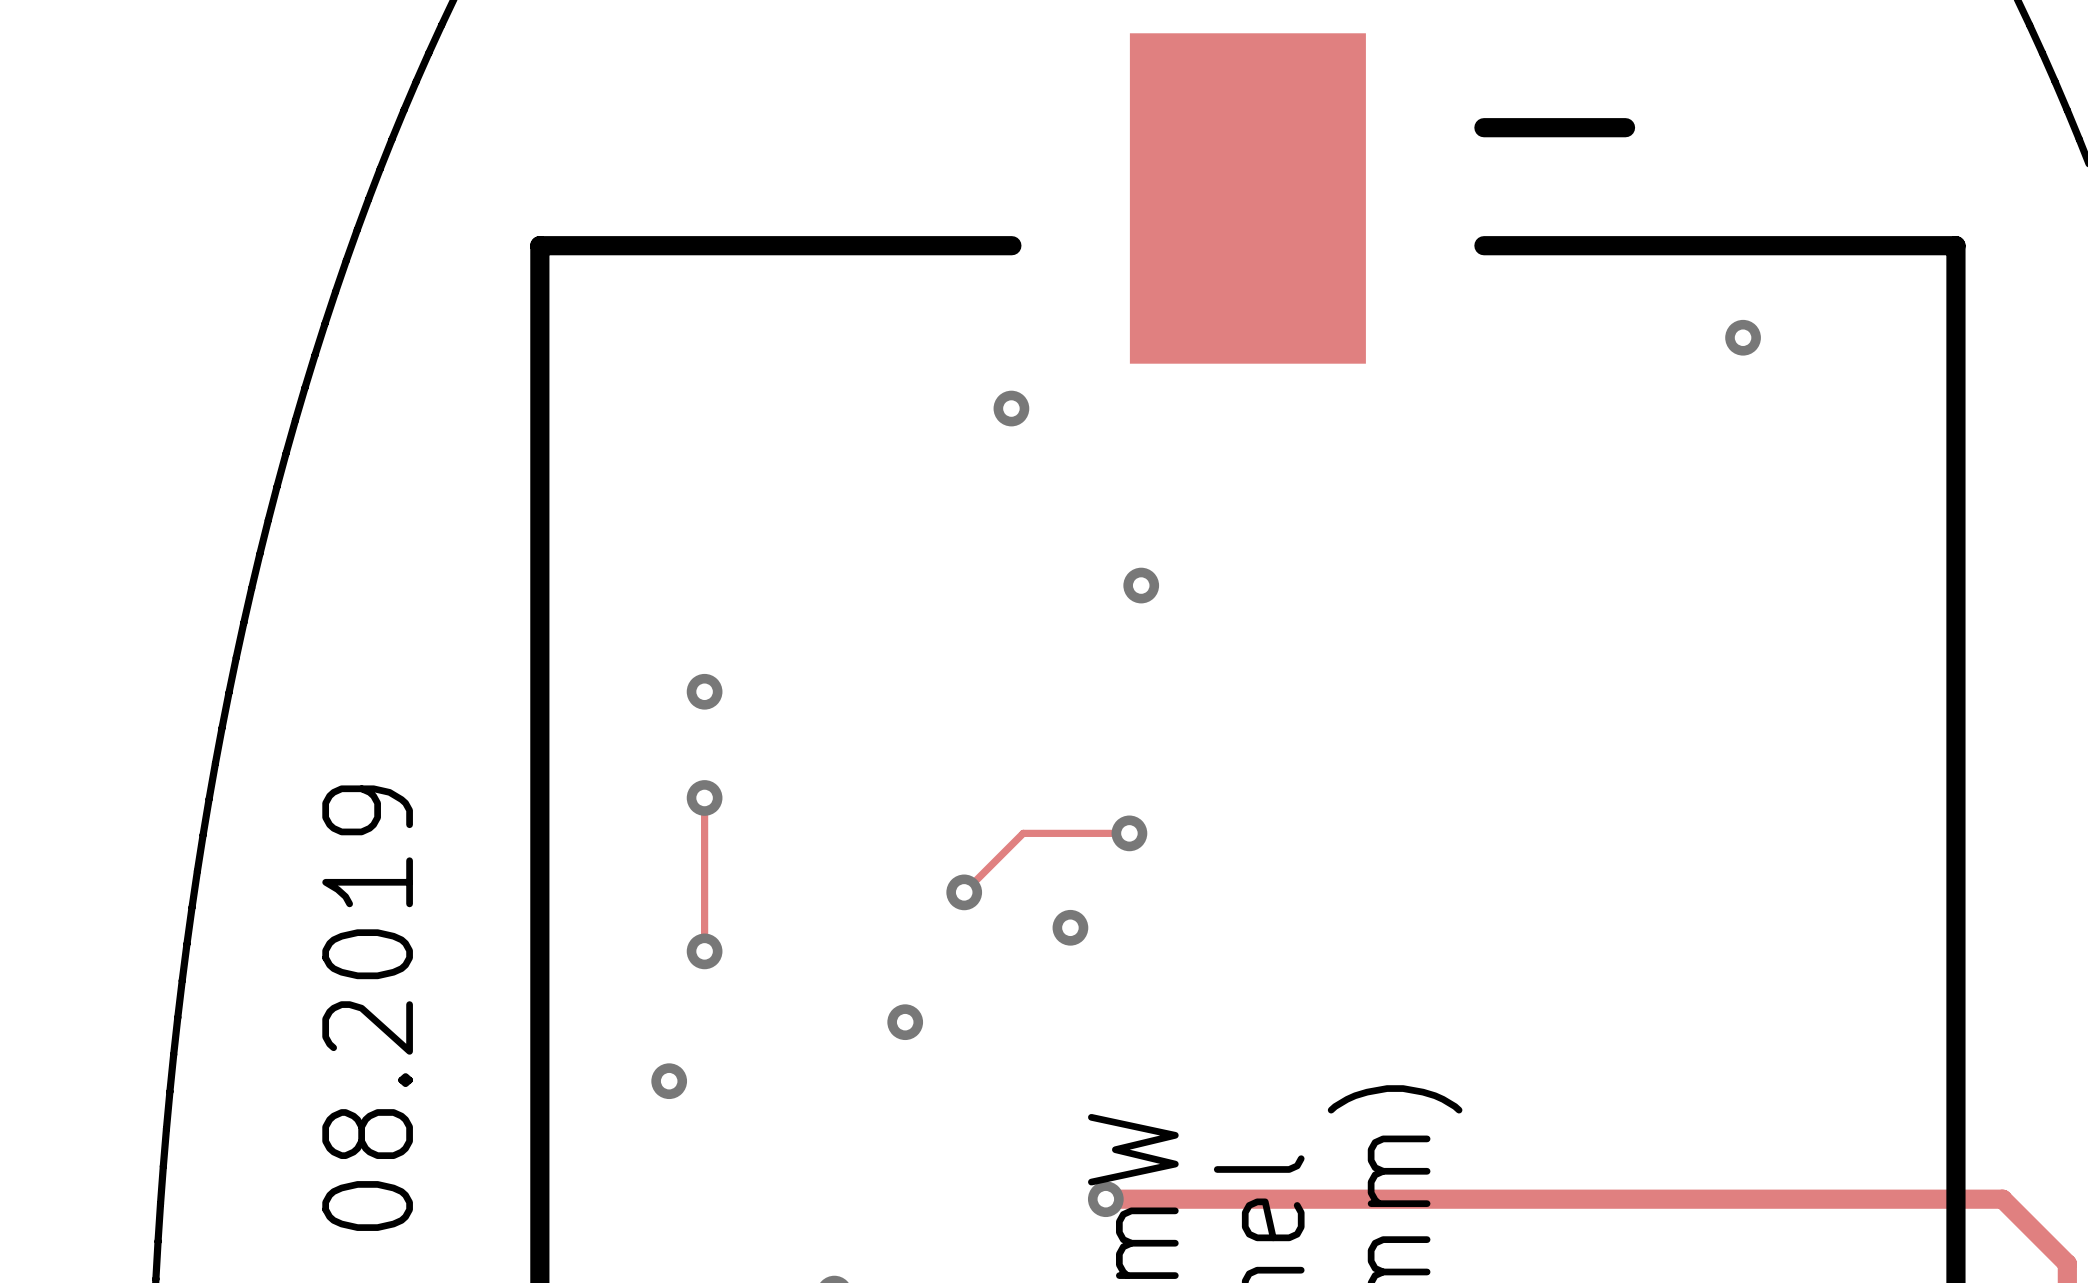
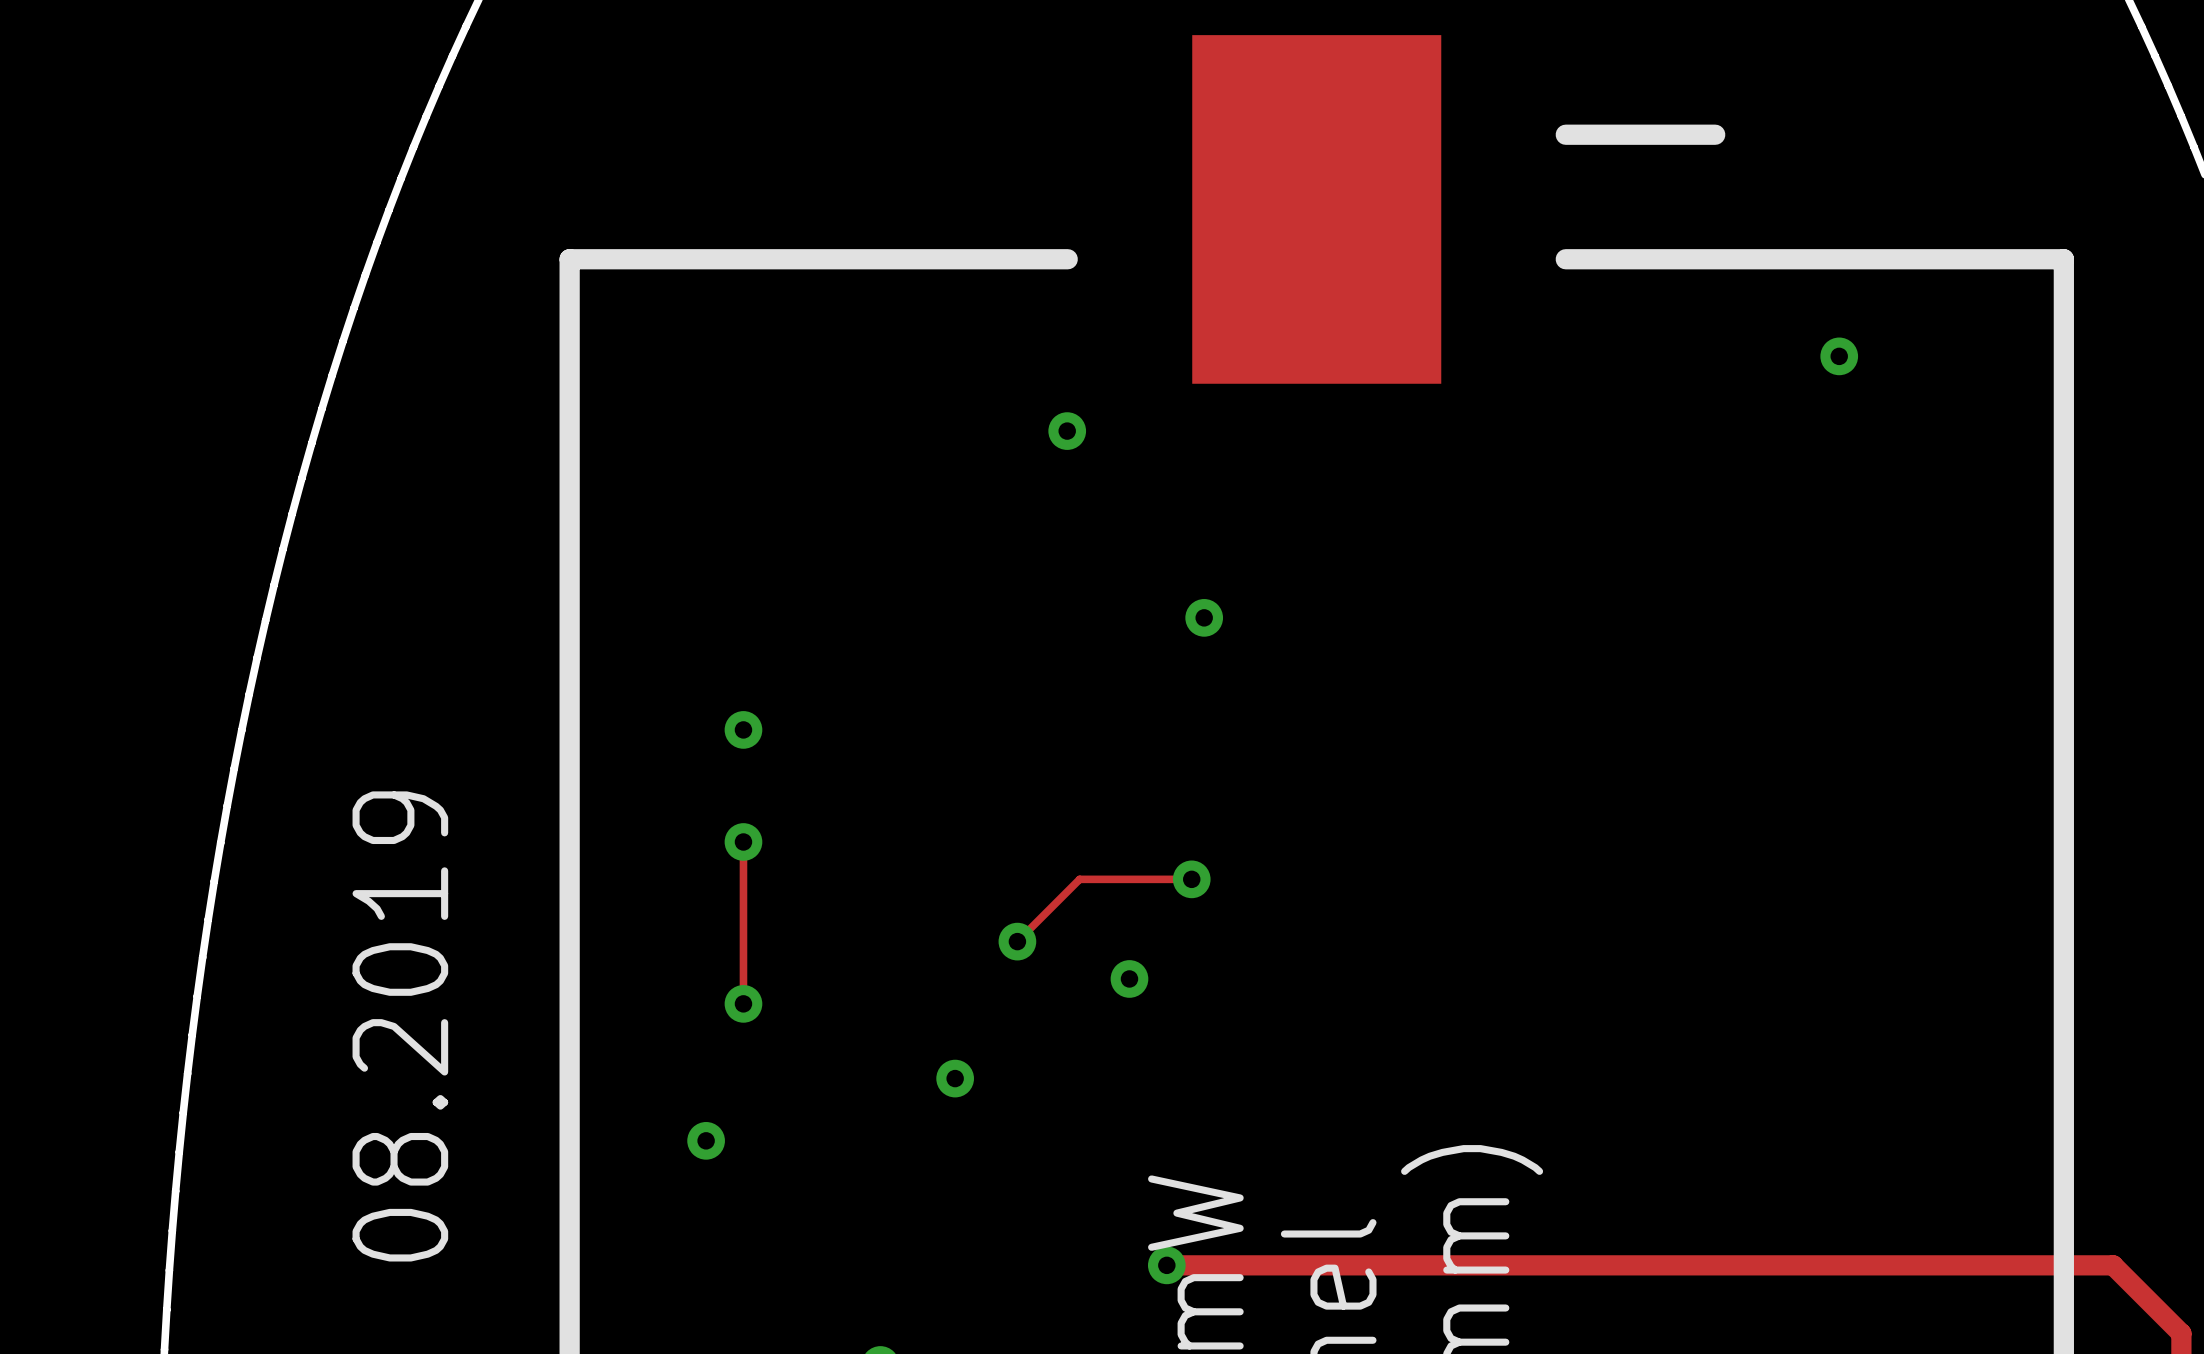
text position: 08.2019 (367, 1008) -> 08.2019 (400, 1026)

